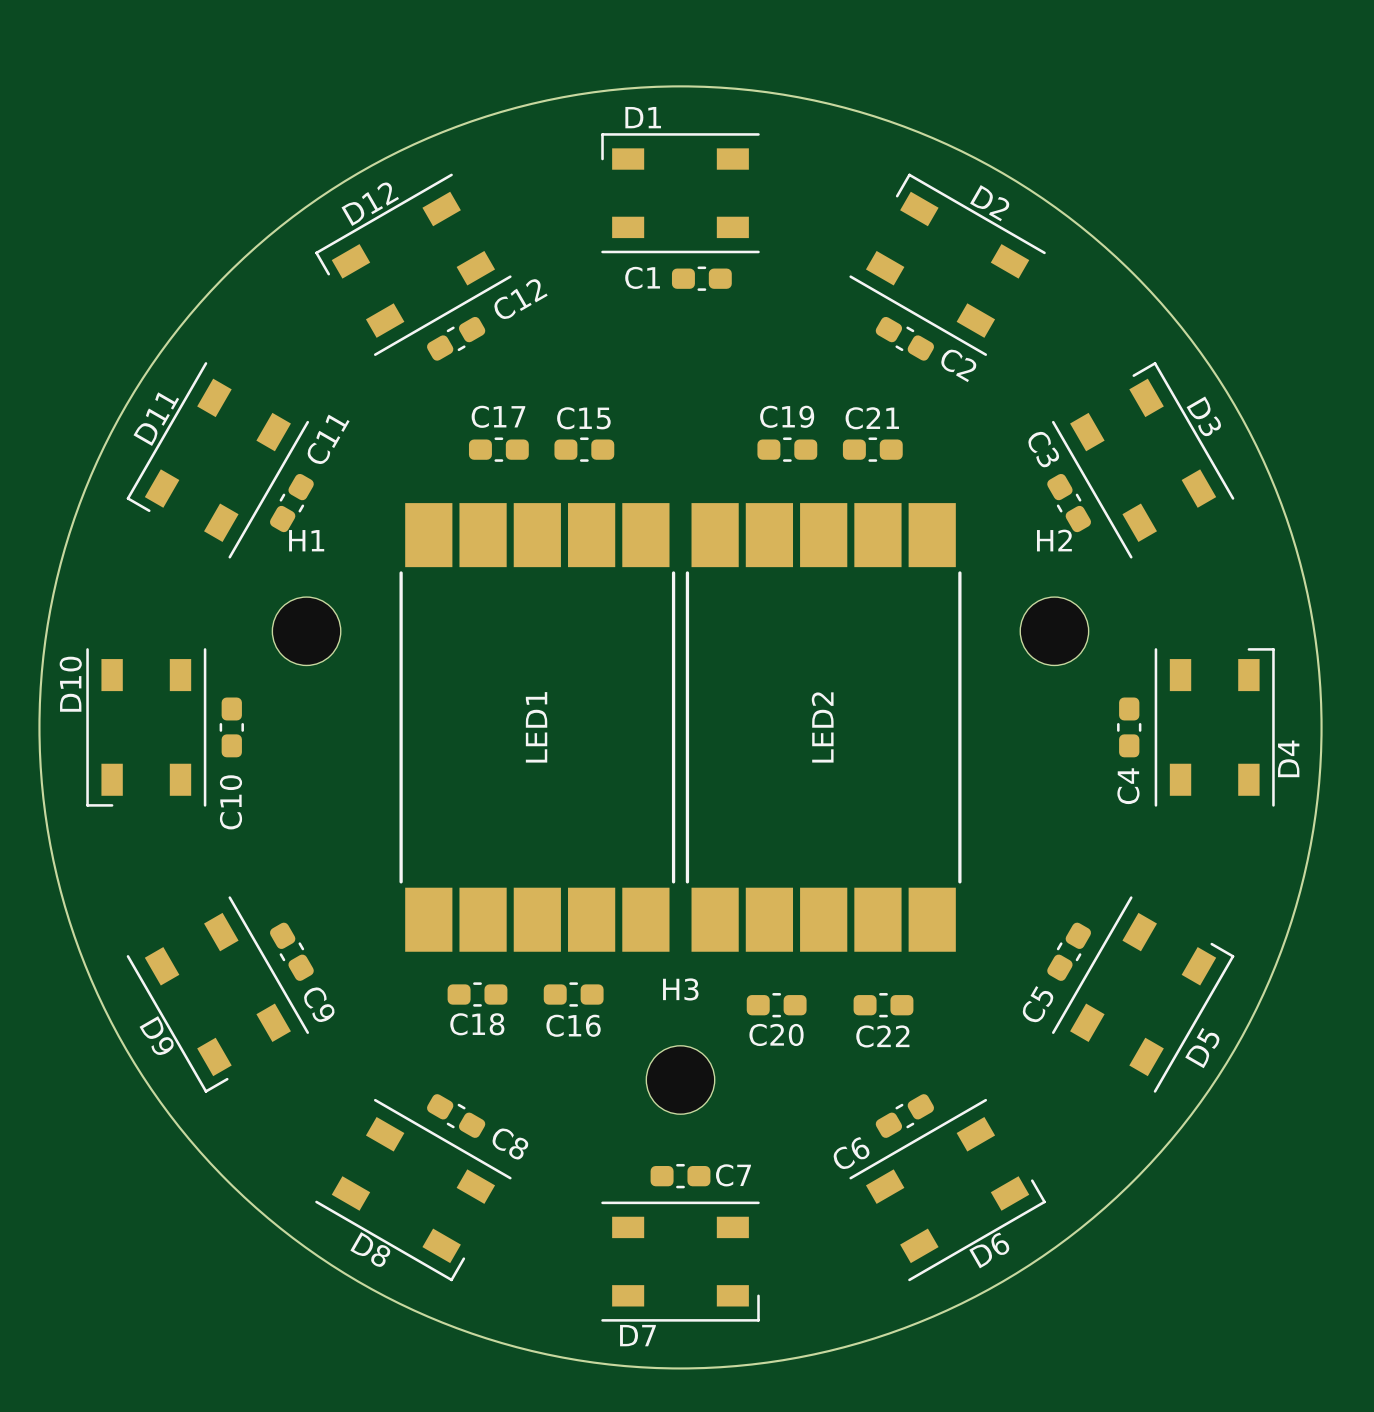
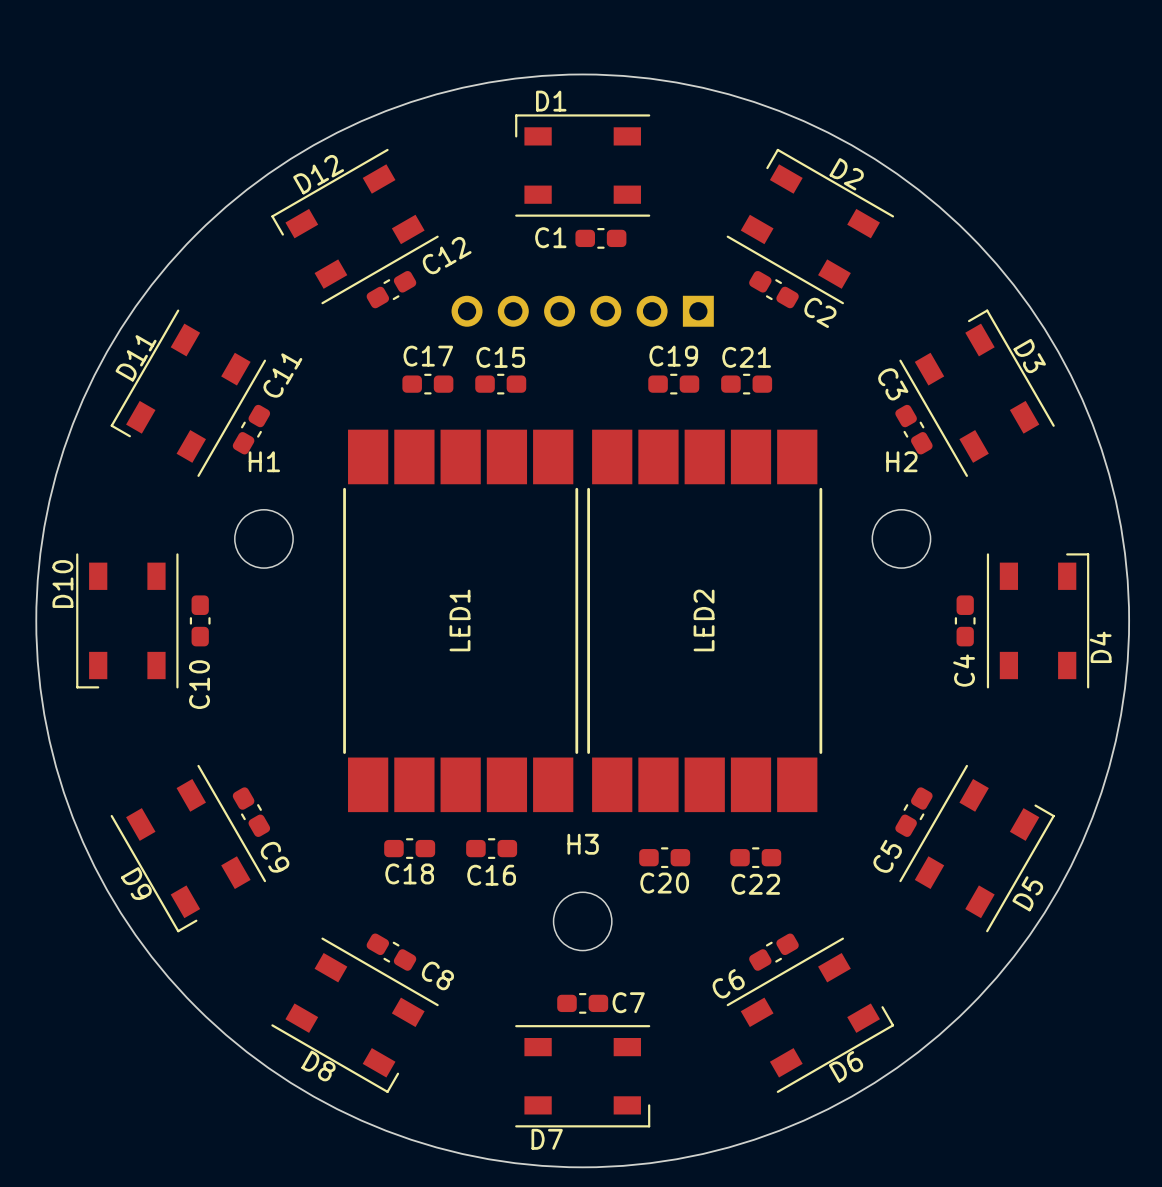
part: none -> (582, 311)

